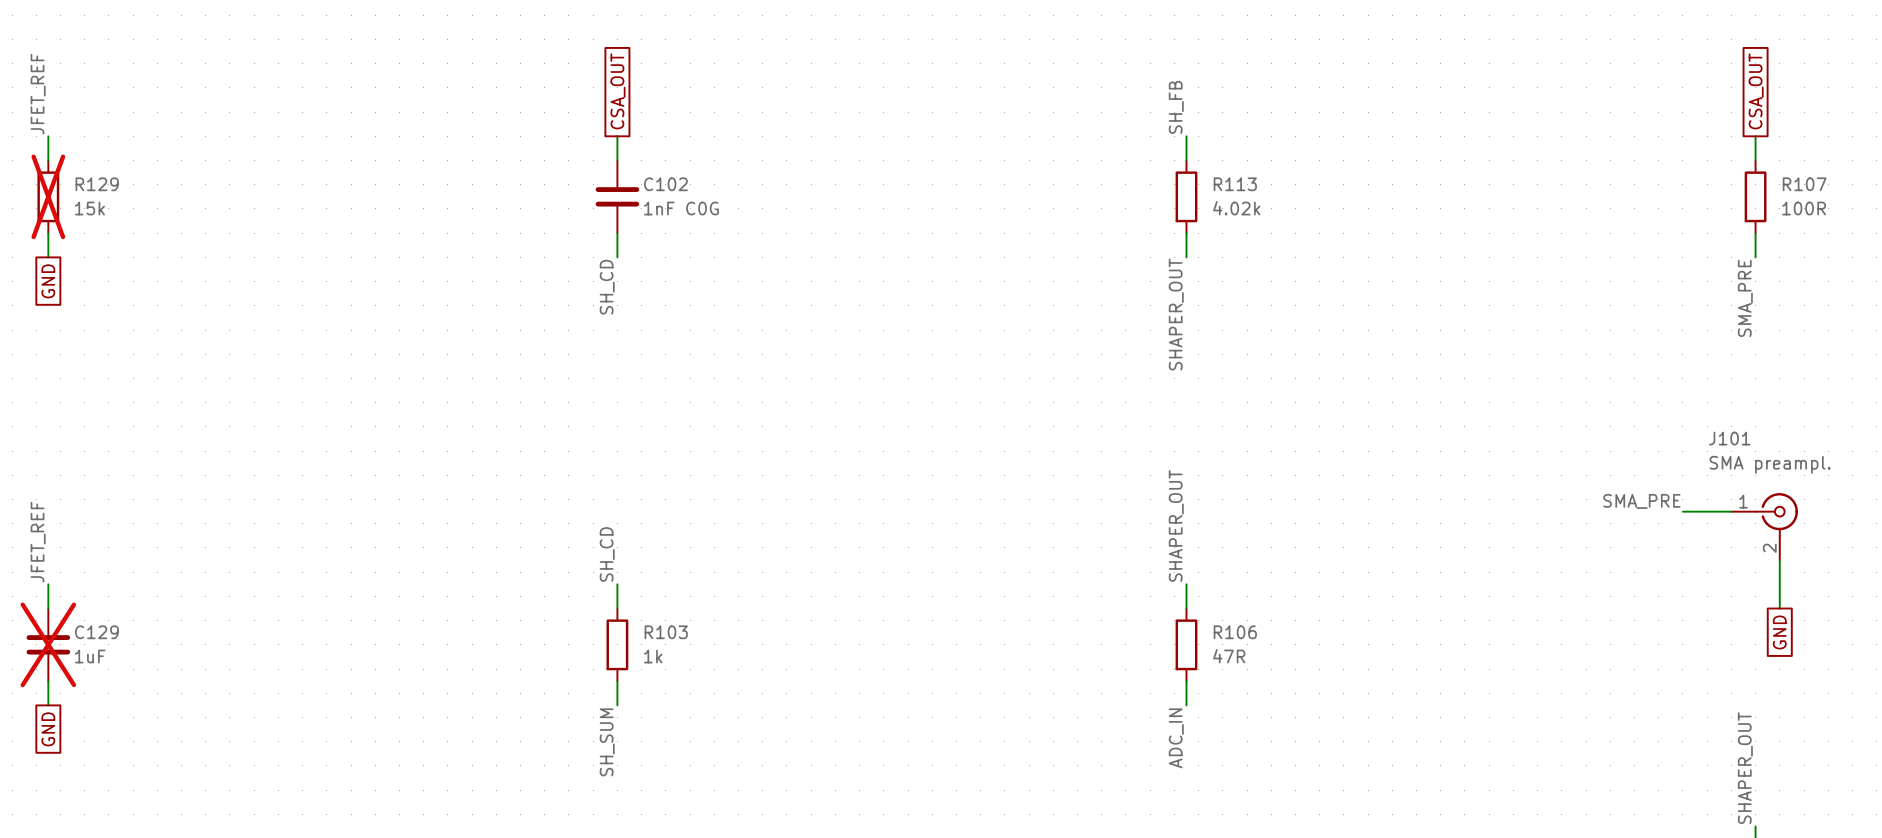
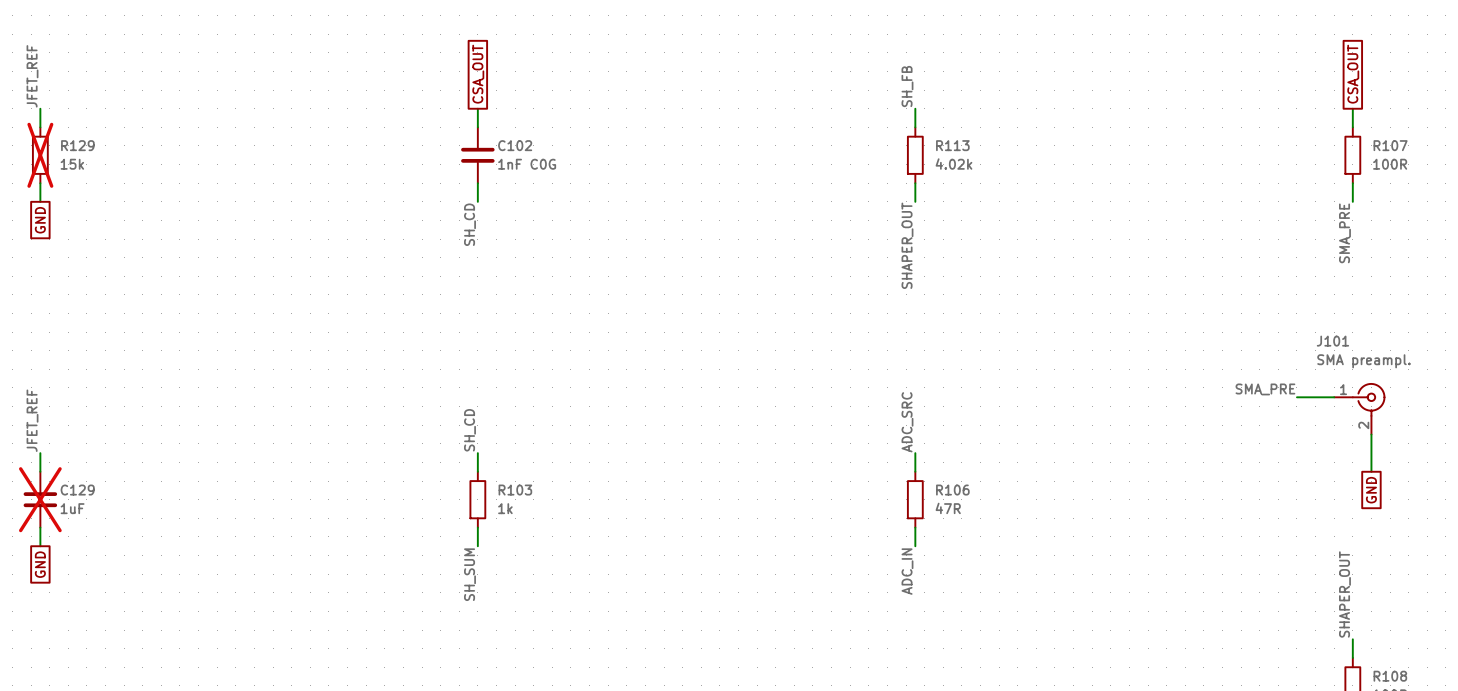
label: SHAPER_OUT (1176, 525) -> ADC_SRC (907, 422)

